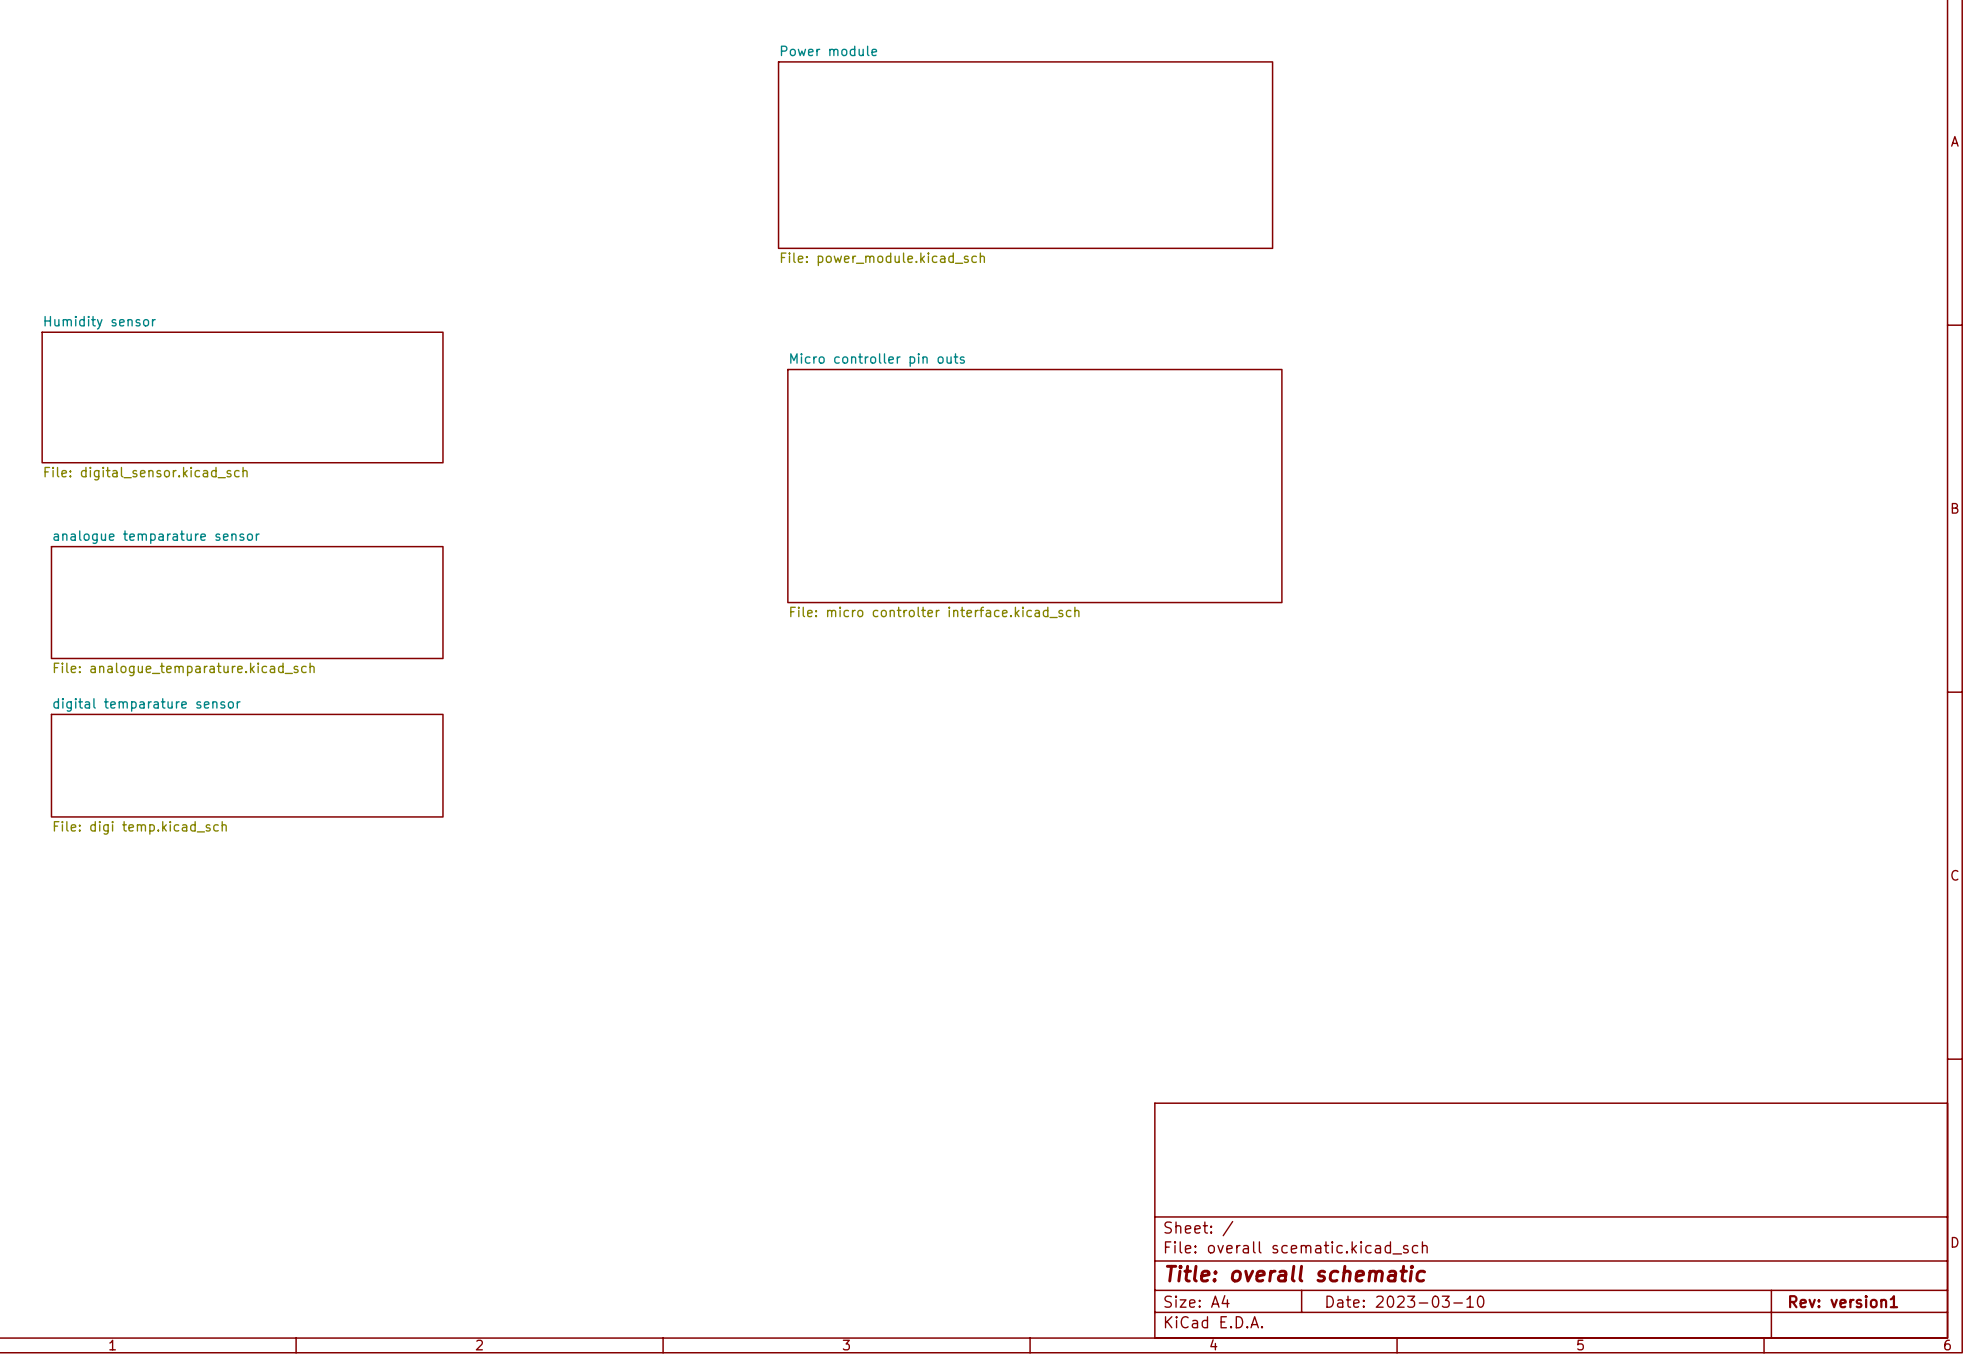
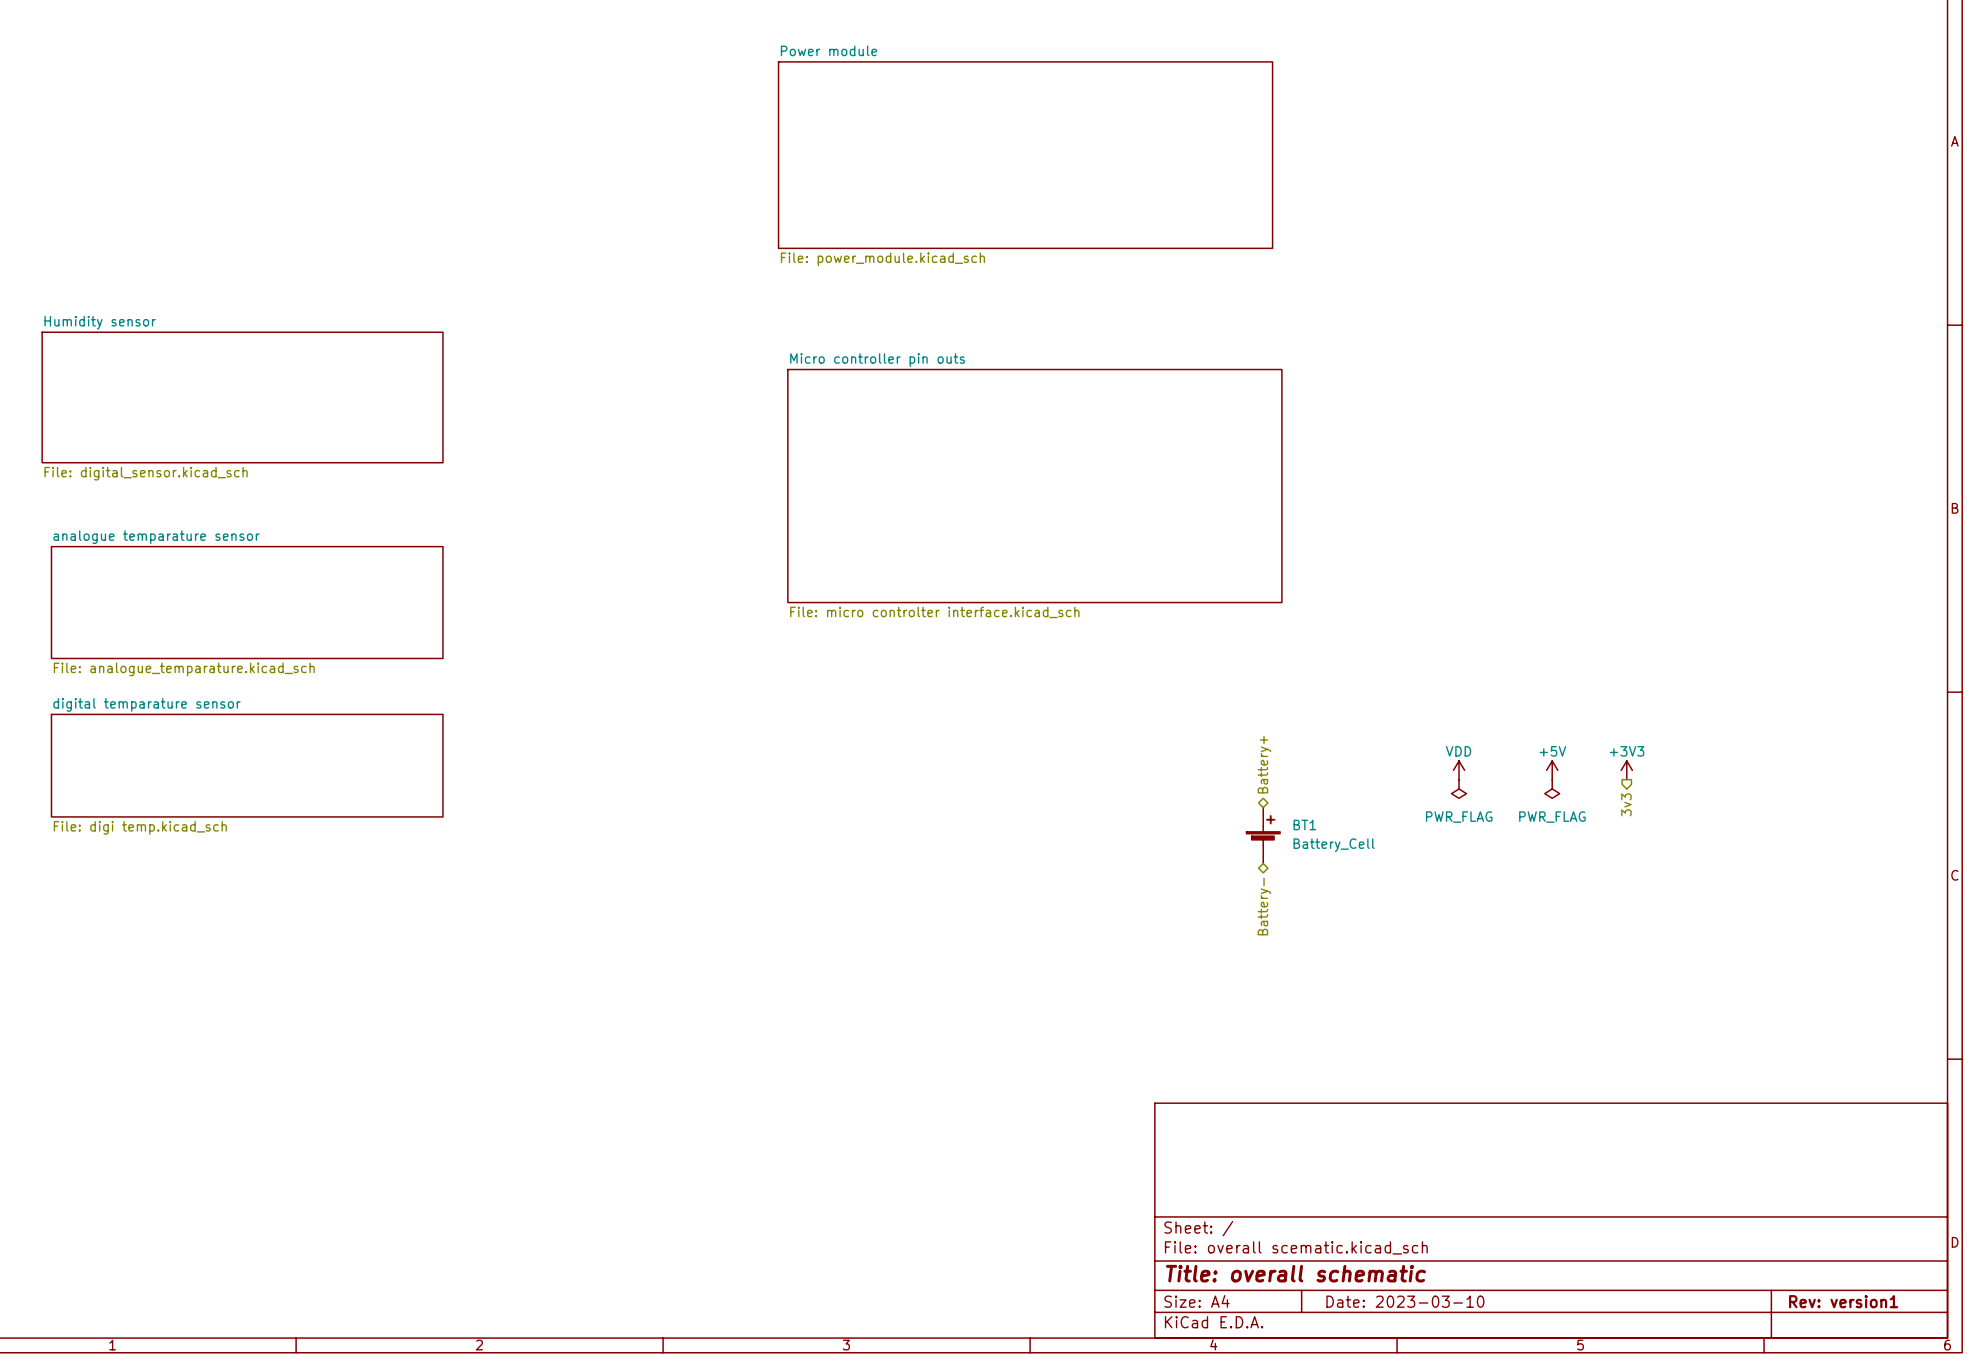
hierarchical label: none -> Battery+ (1264, 764)
power symbol: none -> VDD (1459, 770)
power symbol: none -> +5V (1552, 770)
power symbol: none -> +3V3 (1626, 770)
power symbol: none -> PWR_FLAG (1459, 788)
power symbol: none -> PWR_FLAG (1552, 788)
hierarchical label: none -> 3v3 (1626, 804)
BT1: none -> Battery_Cell (1263, 835)
hierarchical label: none -> Battery- (1264, 906)

